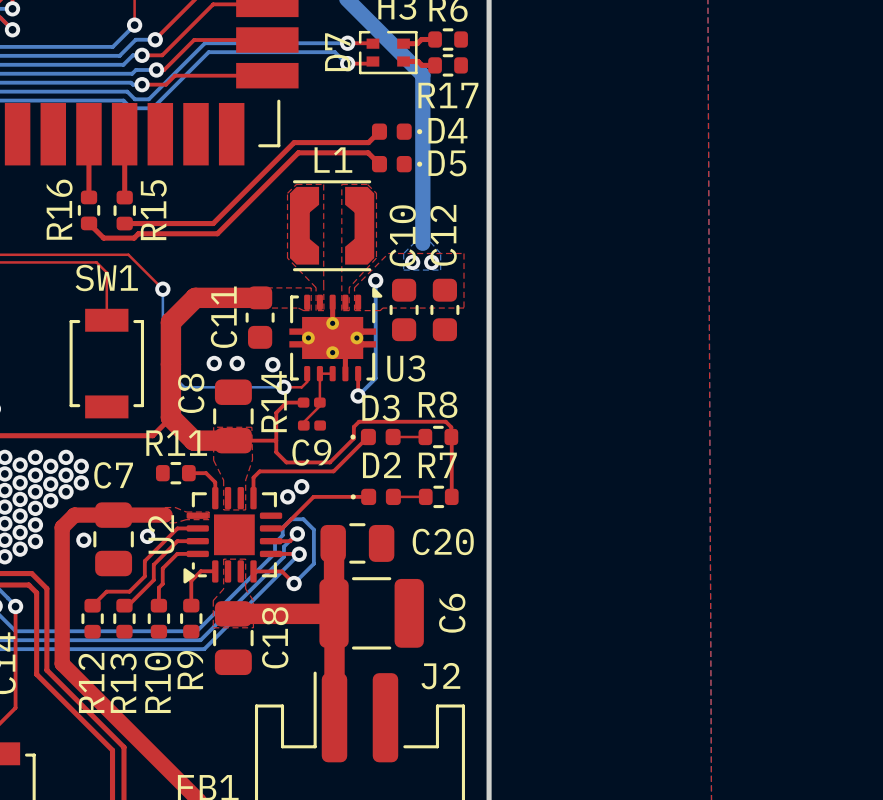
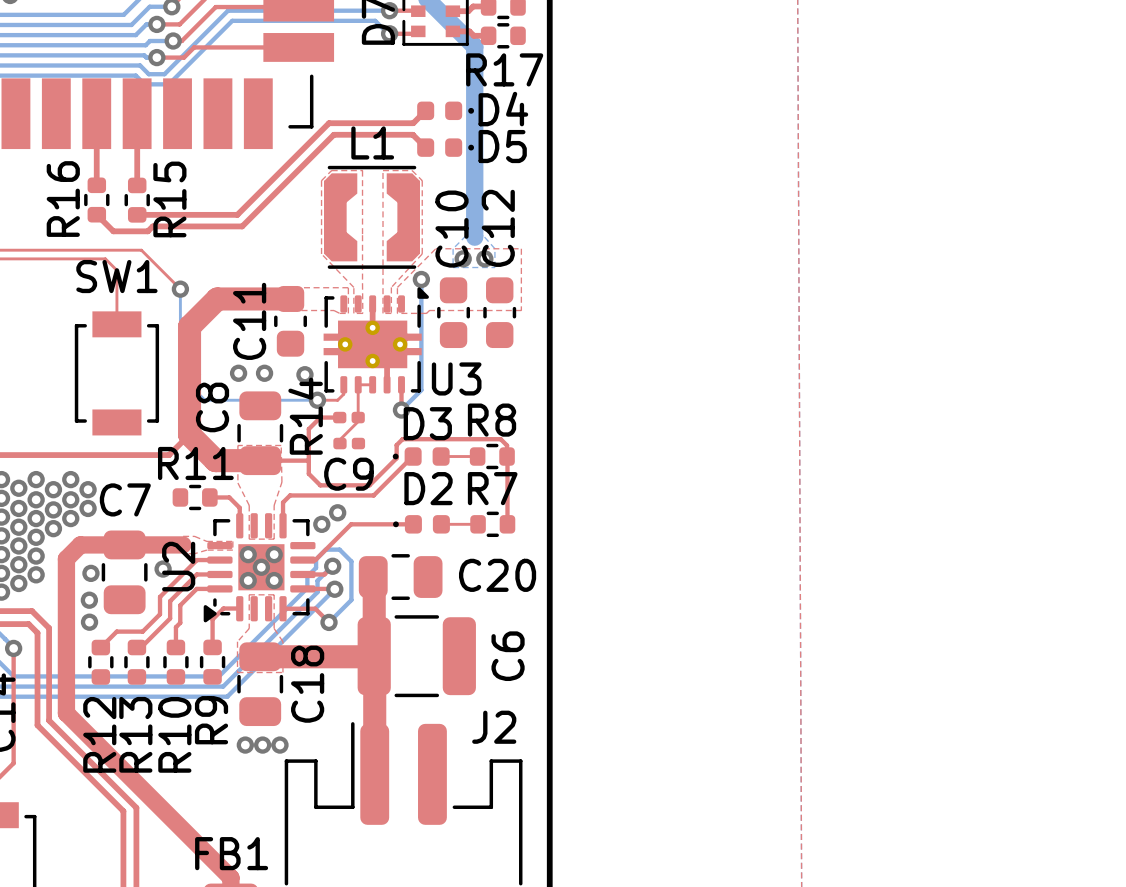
via: none -> (248, 554)
via: none -> (274, 554)
via: none -> (261, 567)
via: none -> (248, 580)
via: none -> (274, 580)
via: none -> (89, 600)
via: none -> (89, 622)
via: none -> (245, 745)
via: none -> (262, 745)
via: none -> (279, 745)

